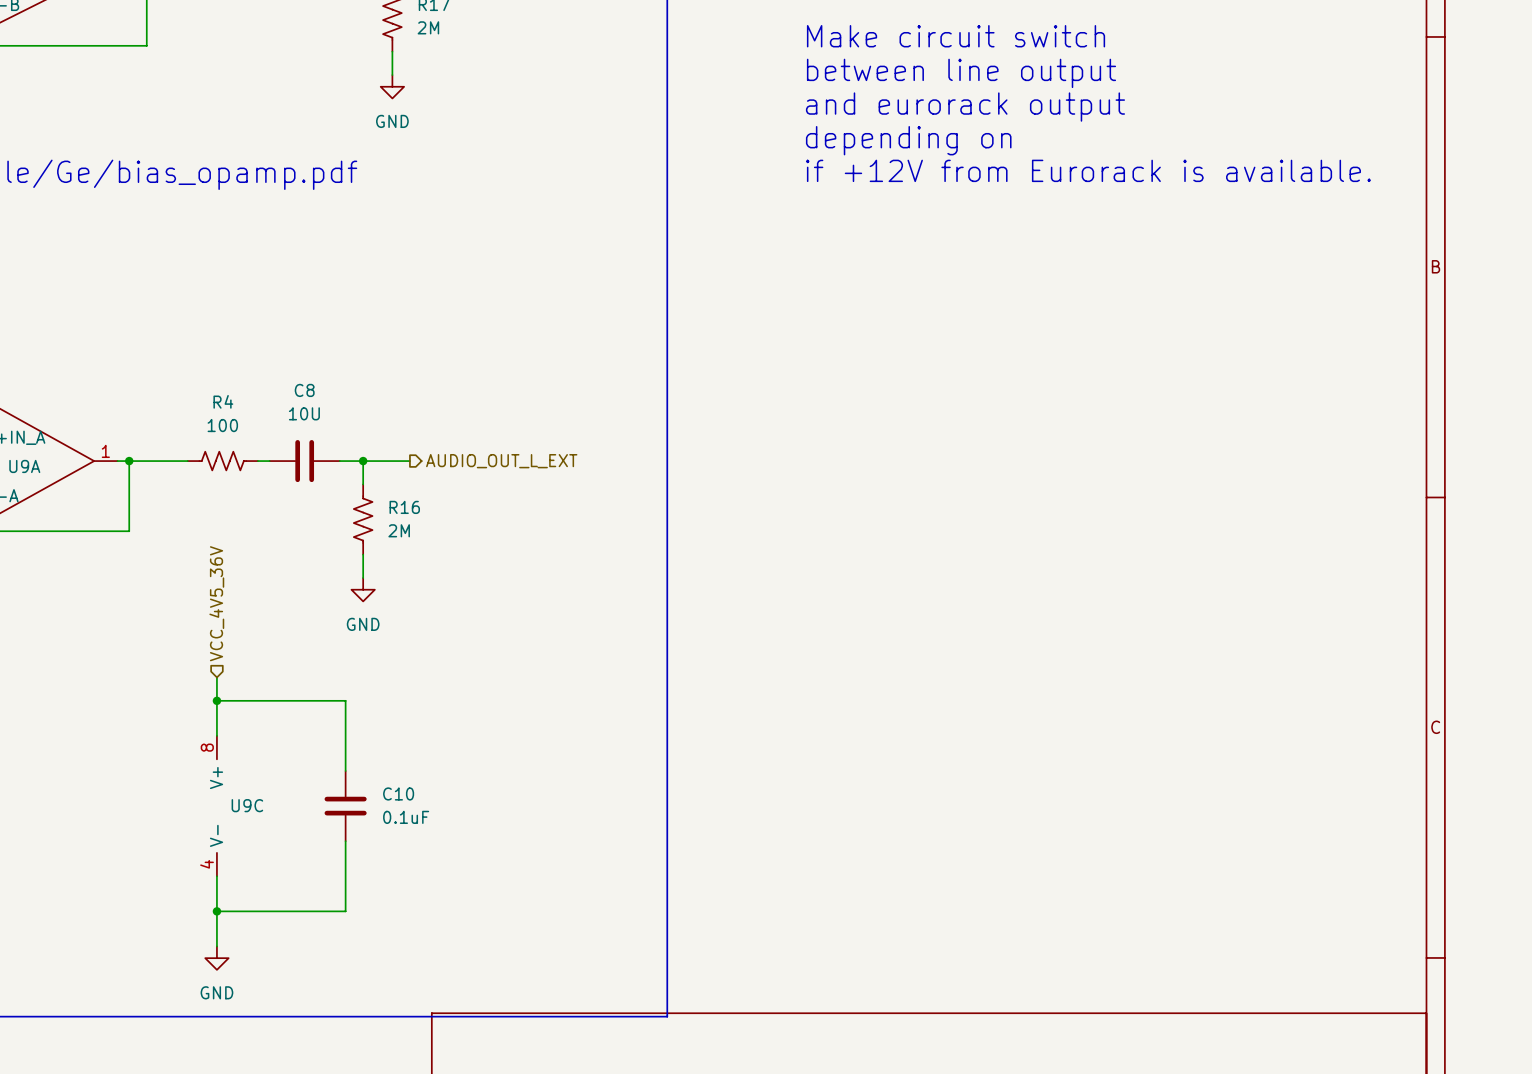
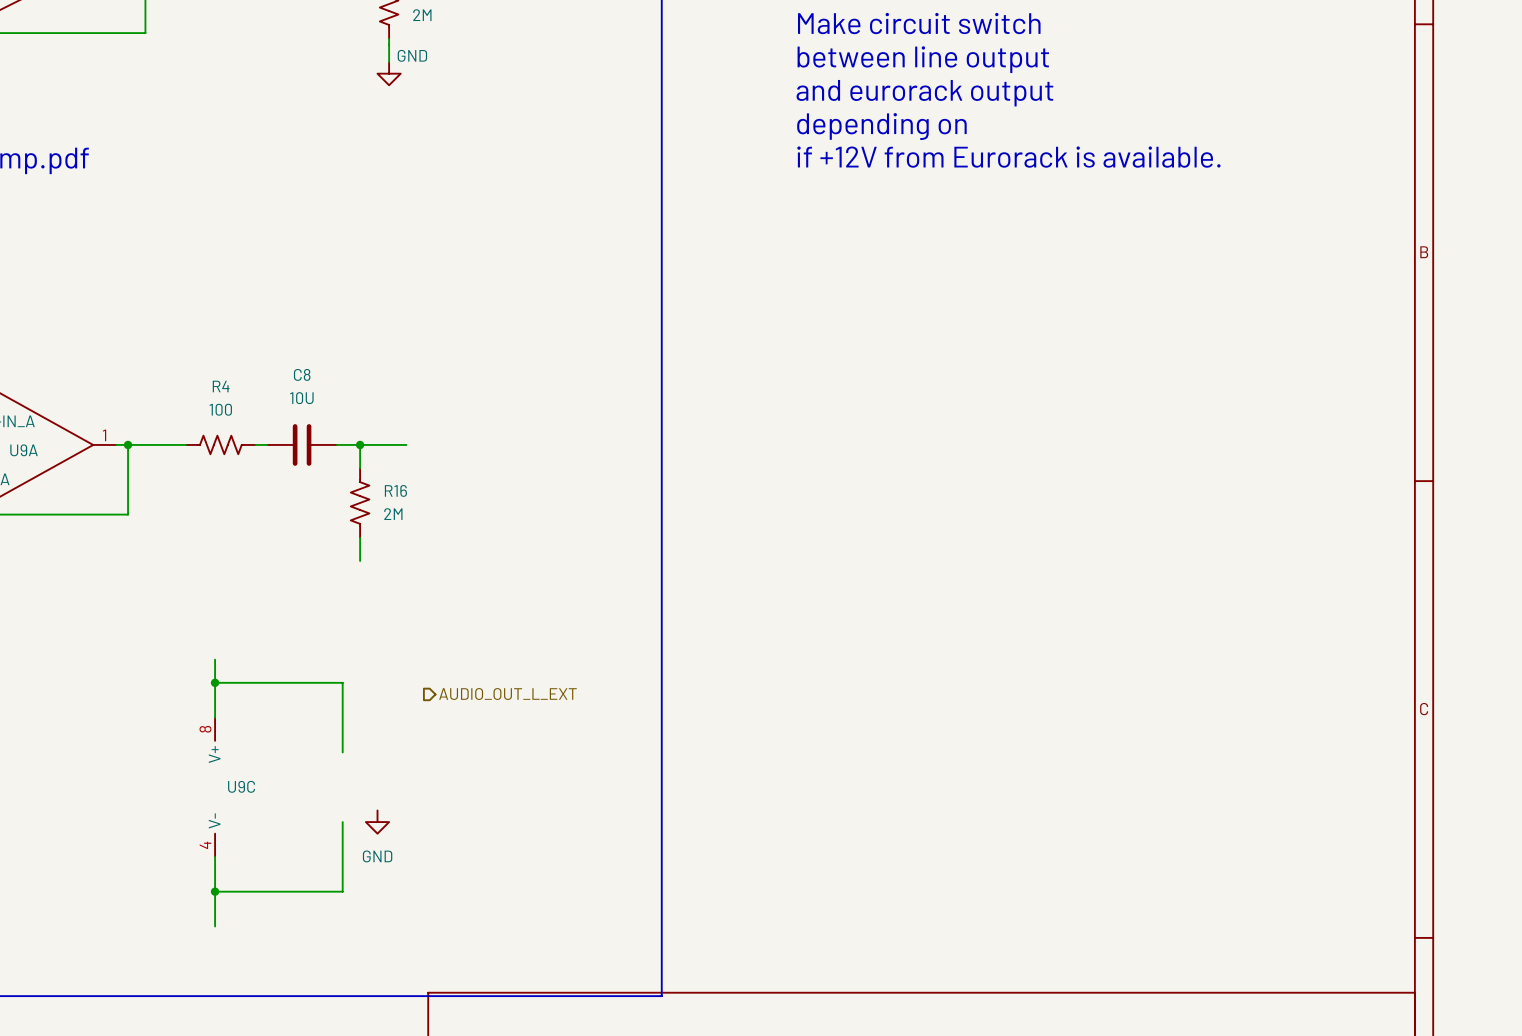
power symbol text position: GND (392, 121) -> GND (412, 55)
hierarchical label: AUDIO_OUT_L_EXT (501, 461) -> none
power symbol: GND (363, 589) -> none
hierarchical label: VCC_4V5_36V (216, 603) -> none
hierarchical label: none -> AUDIO_OUT_L_EXT (507, 694)
C10: 0.1uF (345, 806) -> none
power symbol: none -> GND (377, 822)
power symbol: GND (216, 958) -> none

